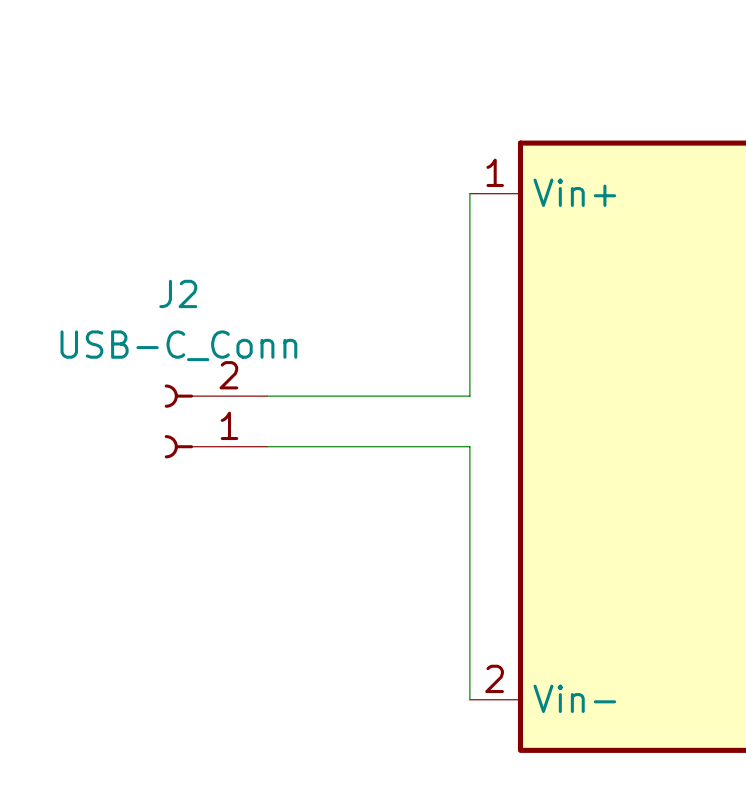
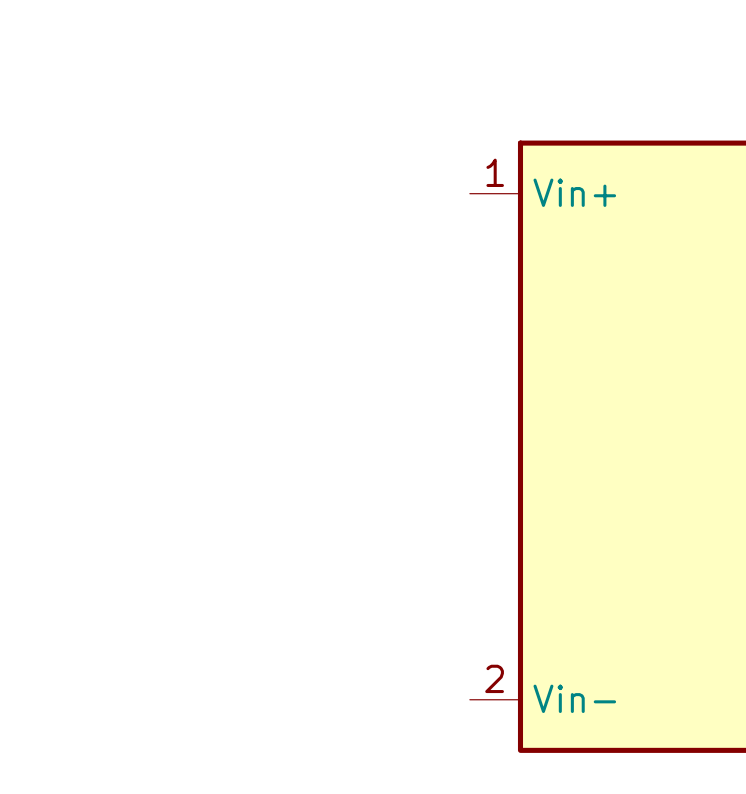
wire: (469, 193) (469, 396) (267, 396) -> none
J2: USB-C_Conn (216, 421) -> none
wire: (267, 446) (469, 446) (469, 699) -> none

